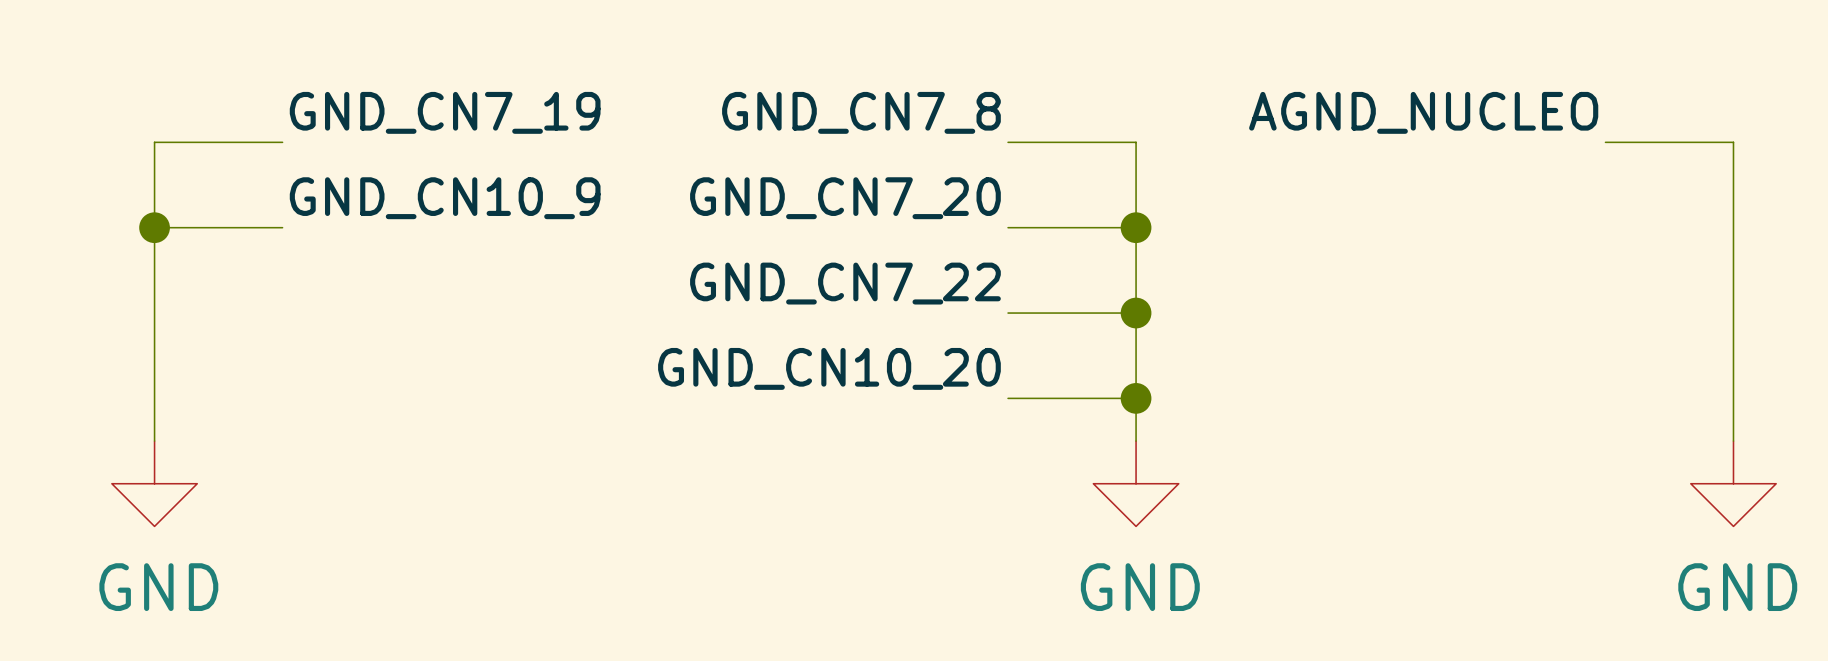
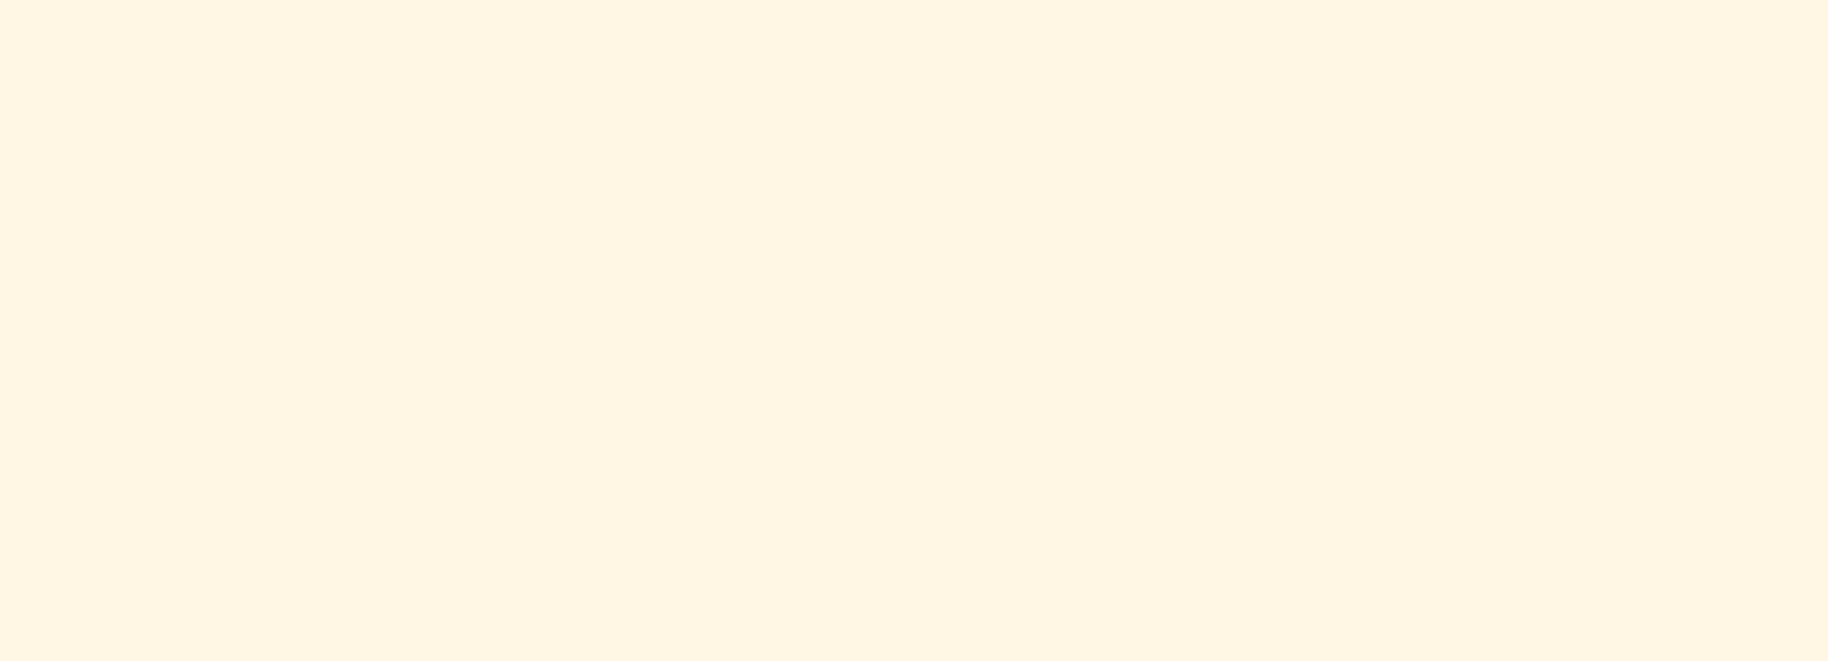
label: GND_CN7_19 (445, 112) -> none
label: GND_CN7_8 (861, 112) -> none
label: AGND_NUCLEO (1423, 112) -> none
wire: (282, 142) (154, 142) (154, 441) -> none
wire: (1008, 142) (1136, 142) (1136, 441) -> none
wire: (1605, 142) (1733, 142) (1733, 441) -> none
label: GND_CN10_9 (445, 198) -> none
label: GND_CN7_20 (845, 198) -> none
wire: (154, 227) (282, 227) -> none
junction: (154, 227) -> none
wire: (1008, 227) (1136, 227) -> none
junction: (1136, 227) -> none
label: GND_CN7_22 (845, 283) -> none
wire: (1008, 313) (1136, 313) -> none
junction: (1136, 313) -> none
label: GND_CN10_20 (829, 368) -> none
wire: (1008, 398) (1136, 398) -> none
junction: (1136, 398) -> none
power symbol: GND (154, 483) -> none
power symbol: GND (1136, 483) -> none
power symbol: GND (1733, 483) -> none

